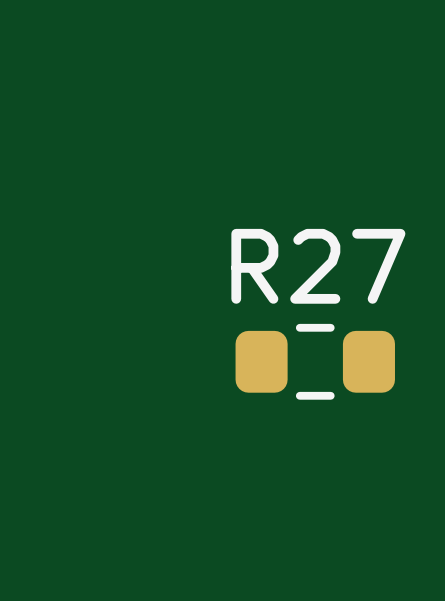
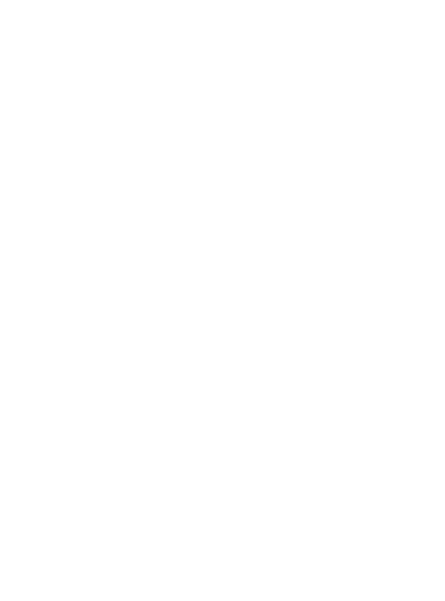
R27: (315, 361) -> none

